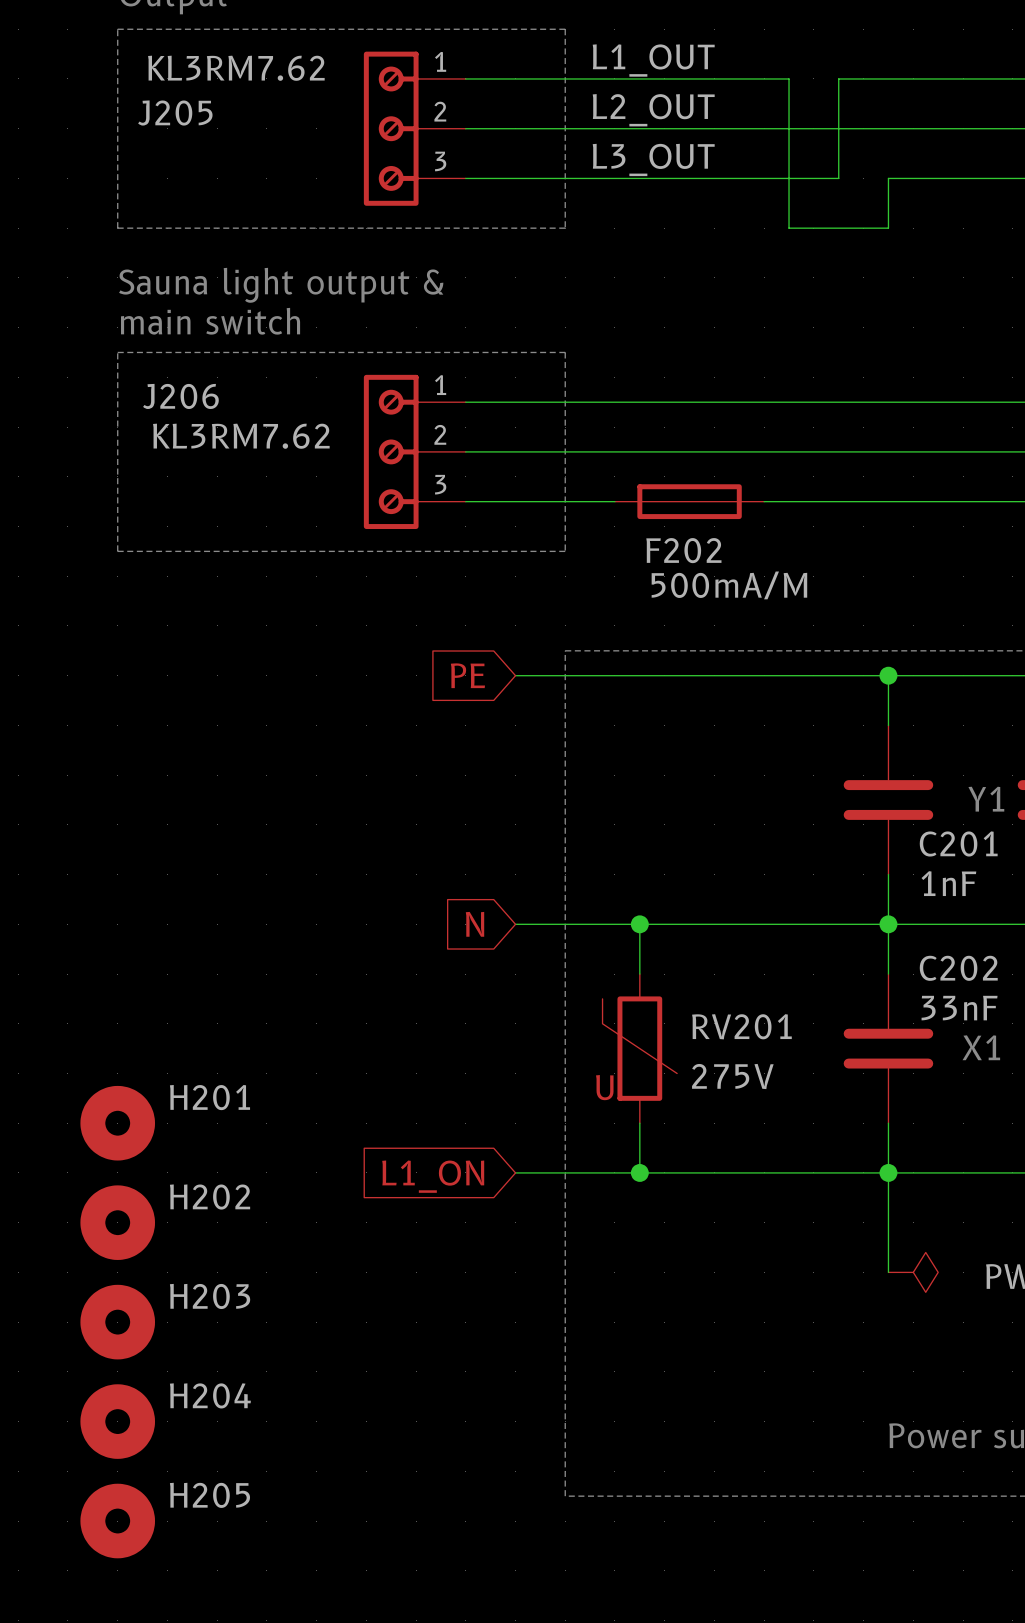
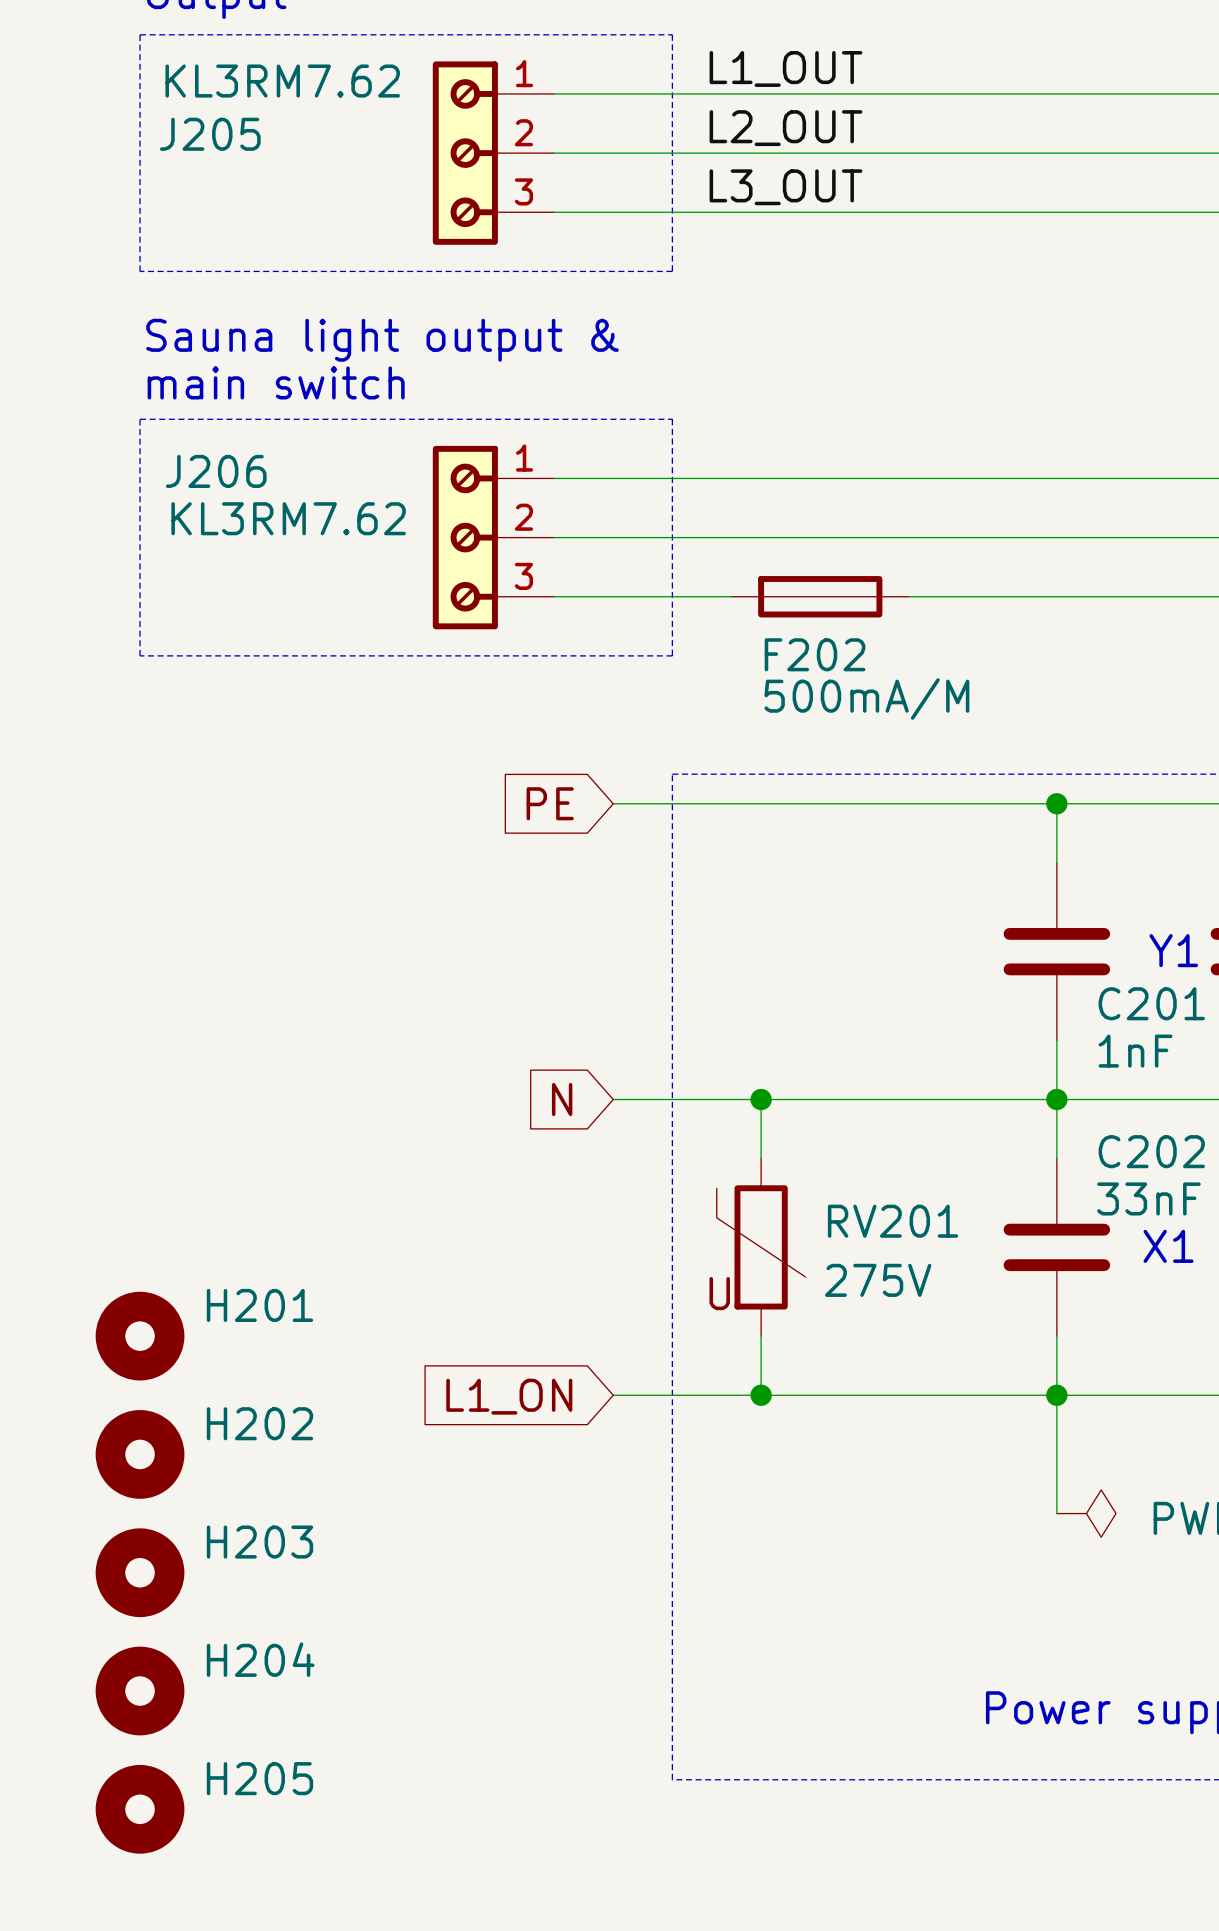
wire: (789, 78) (789, 228) (888, 228) (888, 178) -> (938, 93) (997, 93)
wire: (838, 78) (838, 178) -> (1056, 212) (997, 212)

